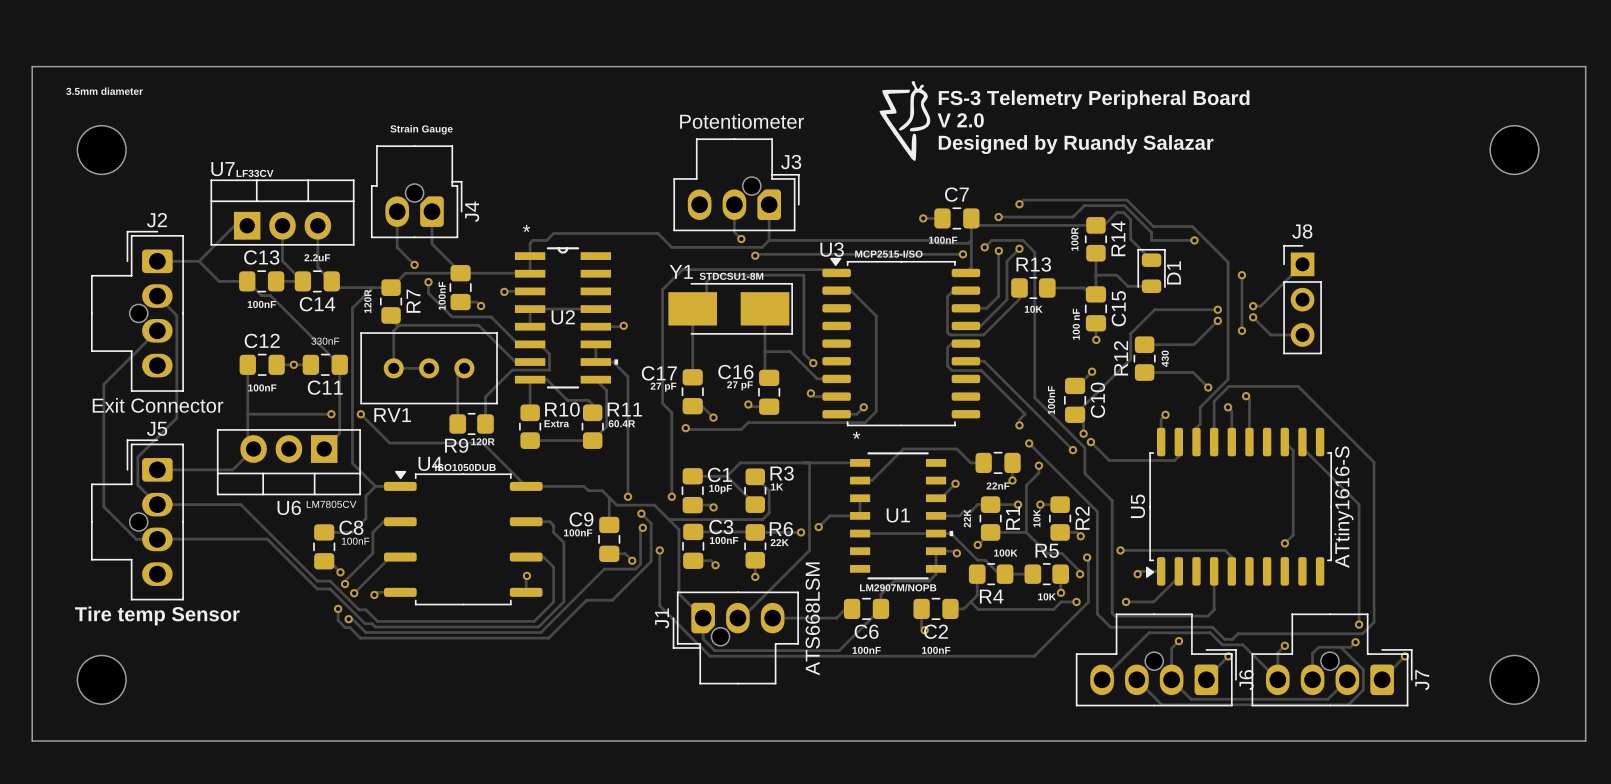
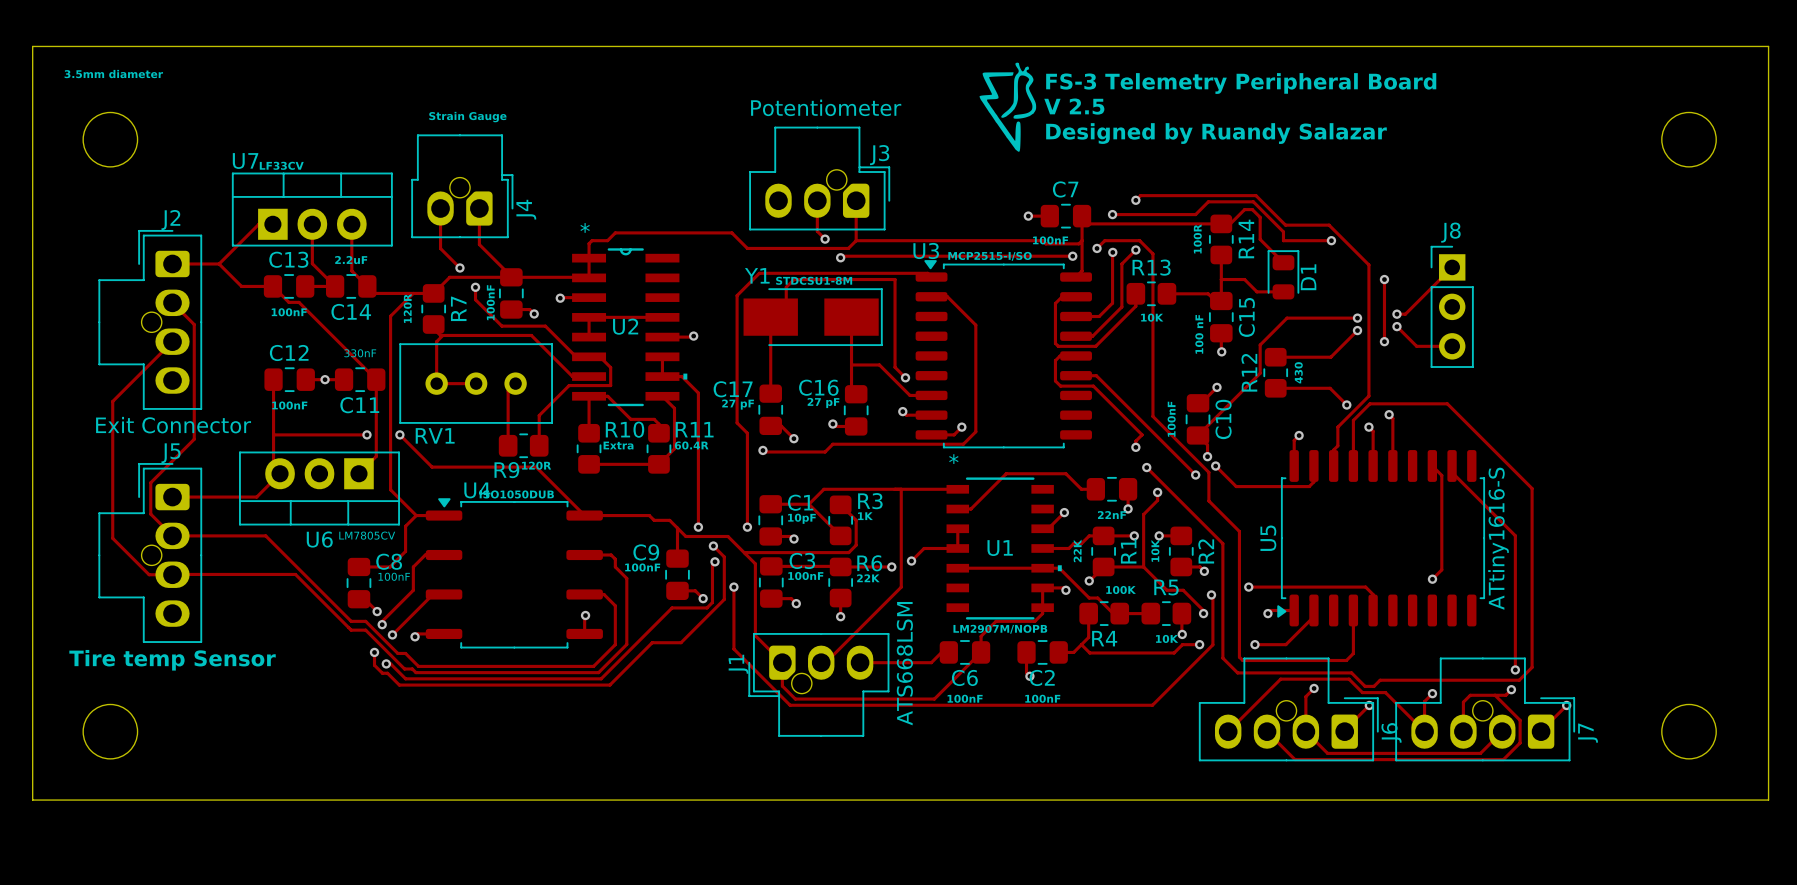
text: V 2.0 (960, 120) -> V 2.5 (1074, 106)

